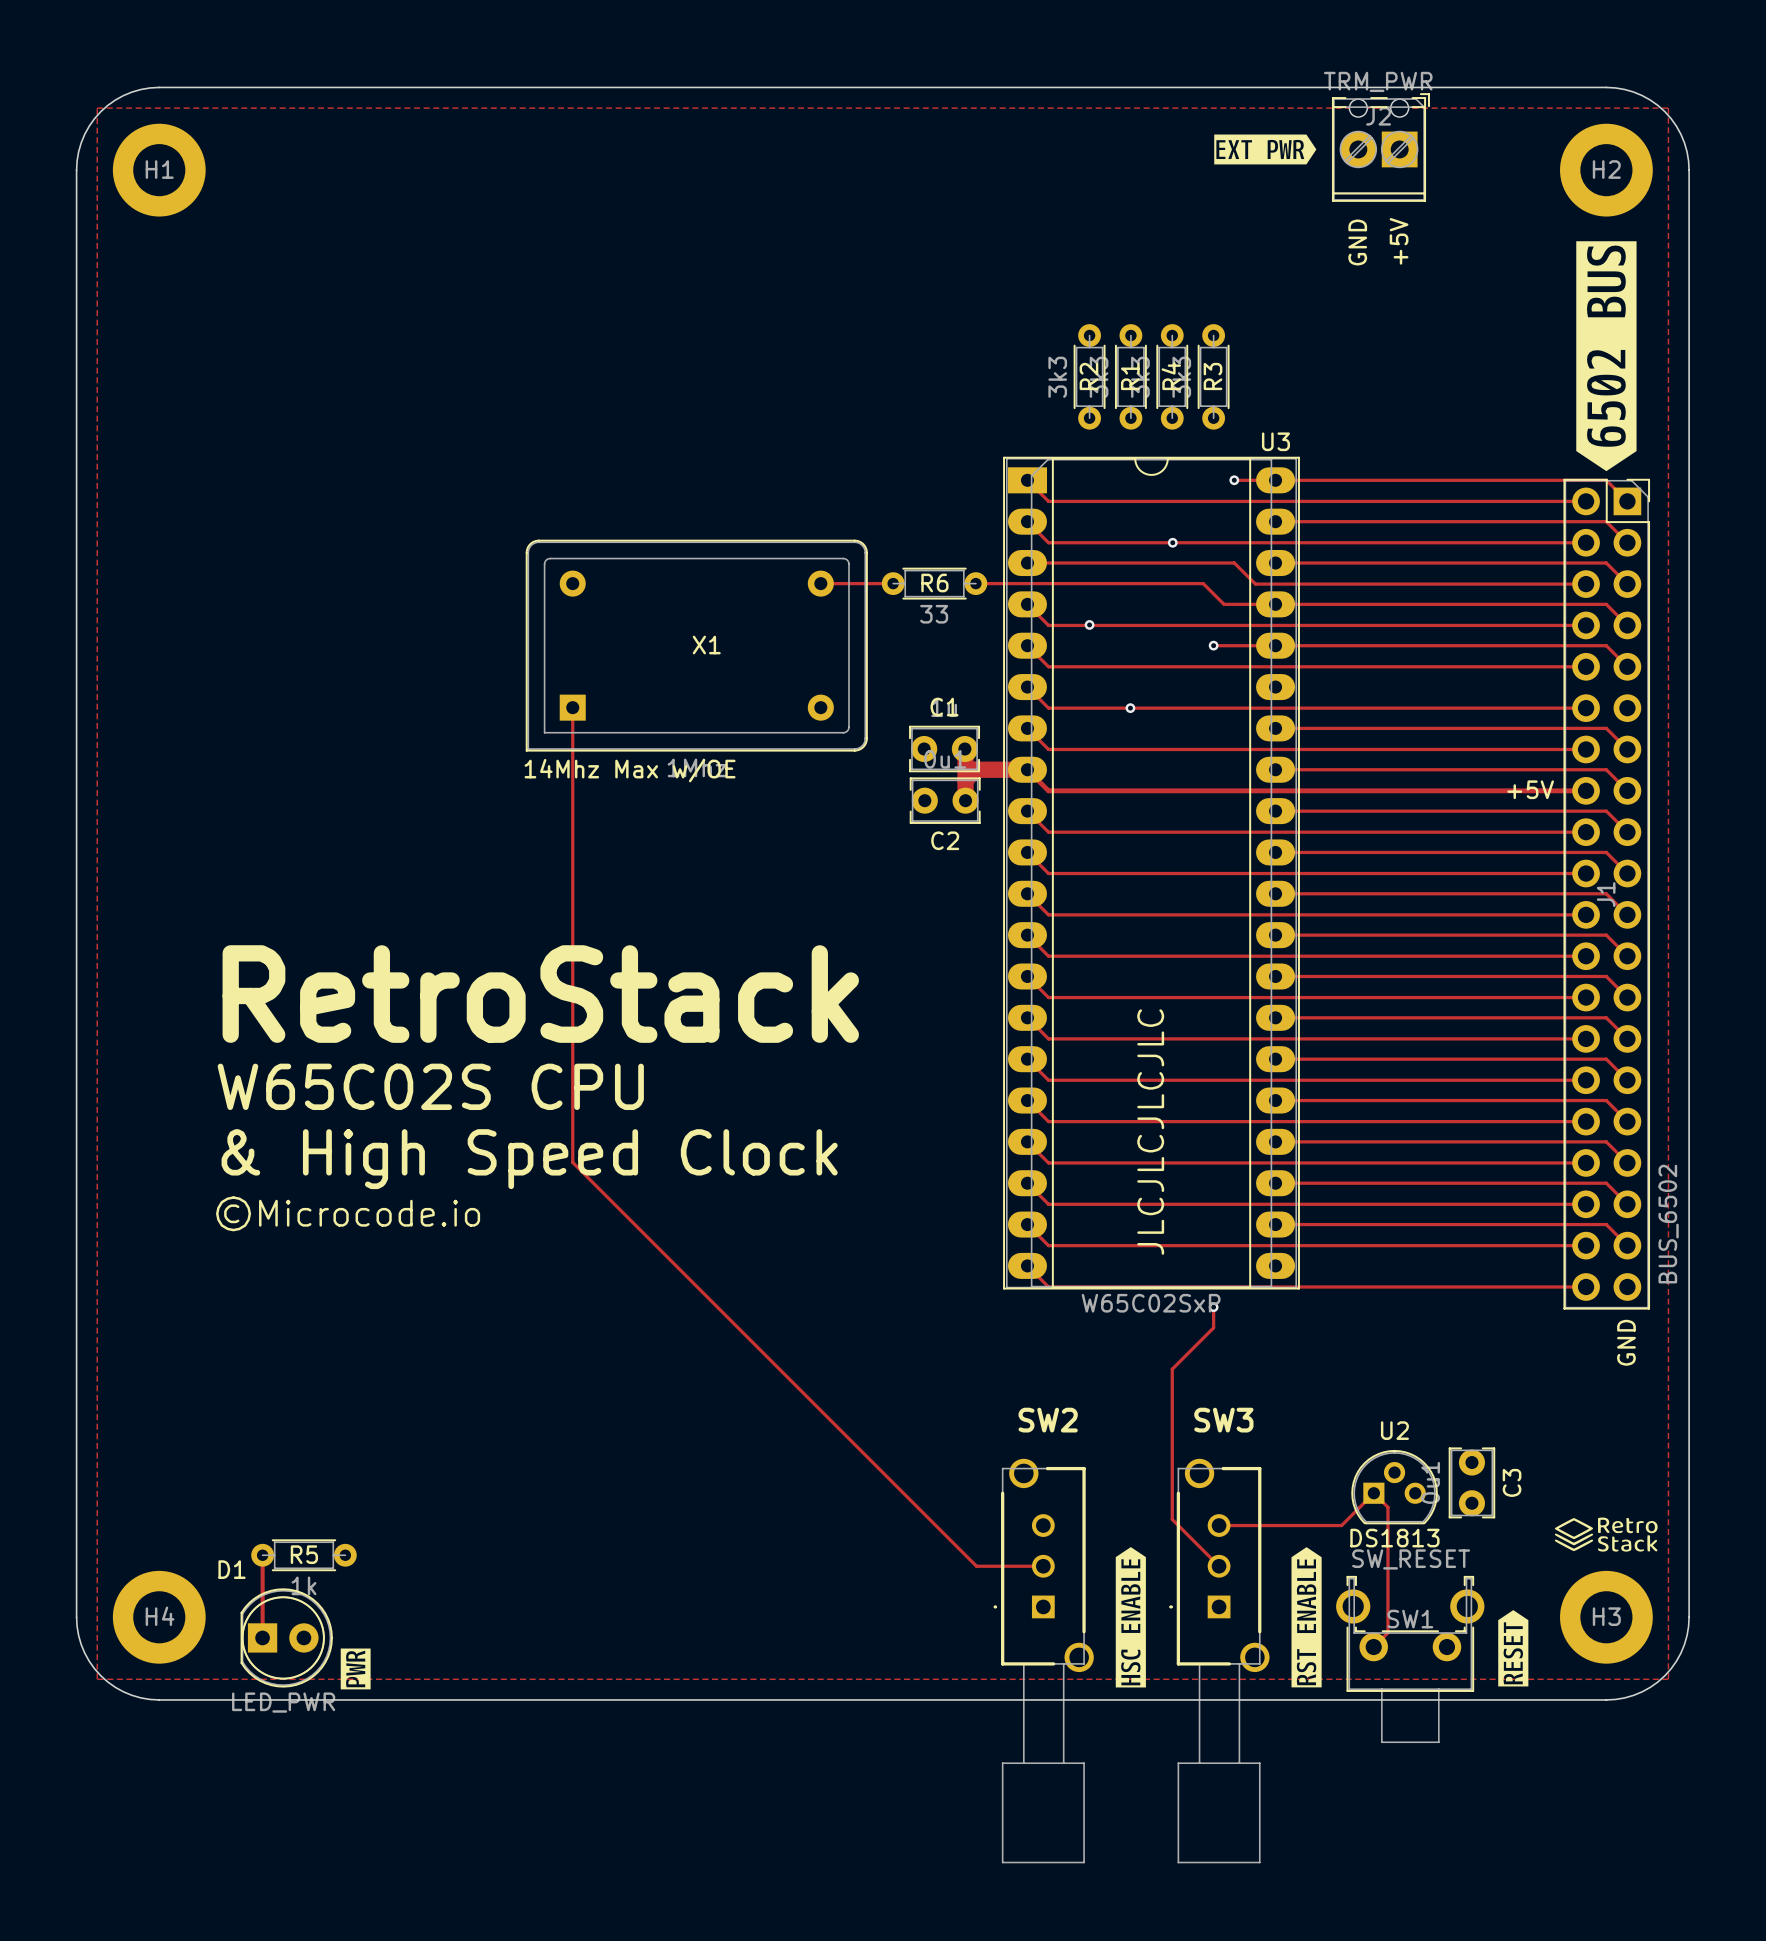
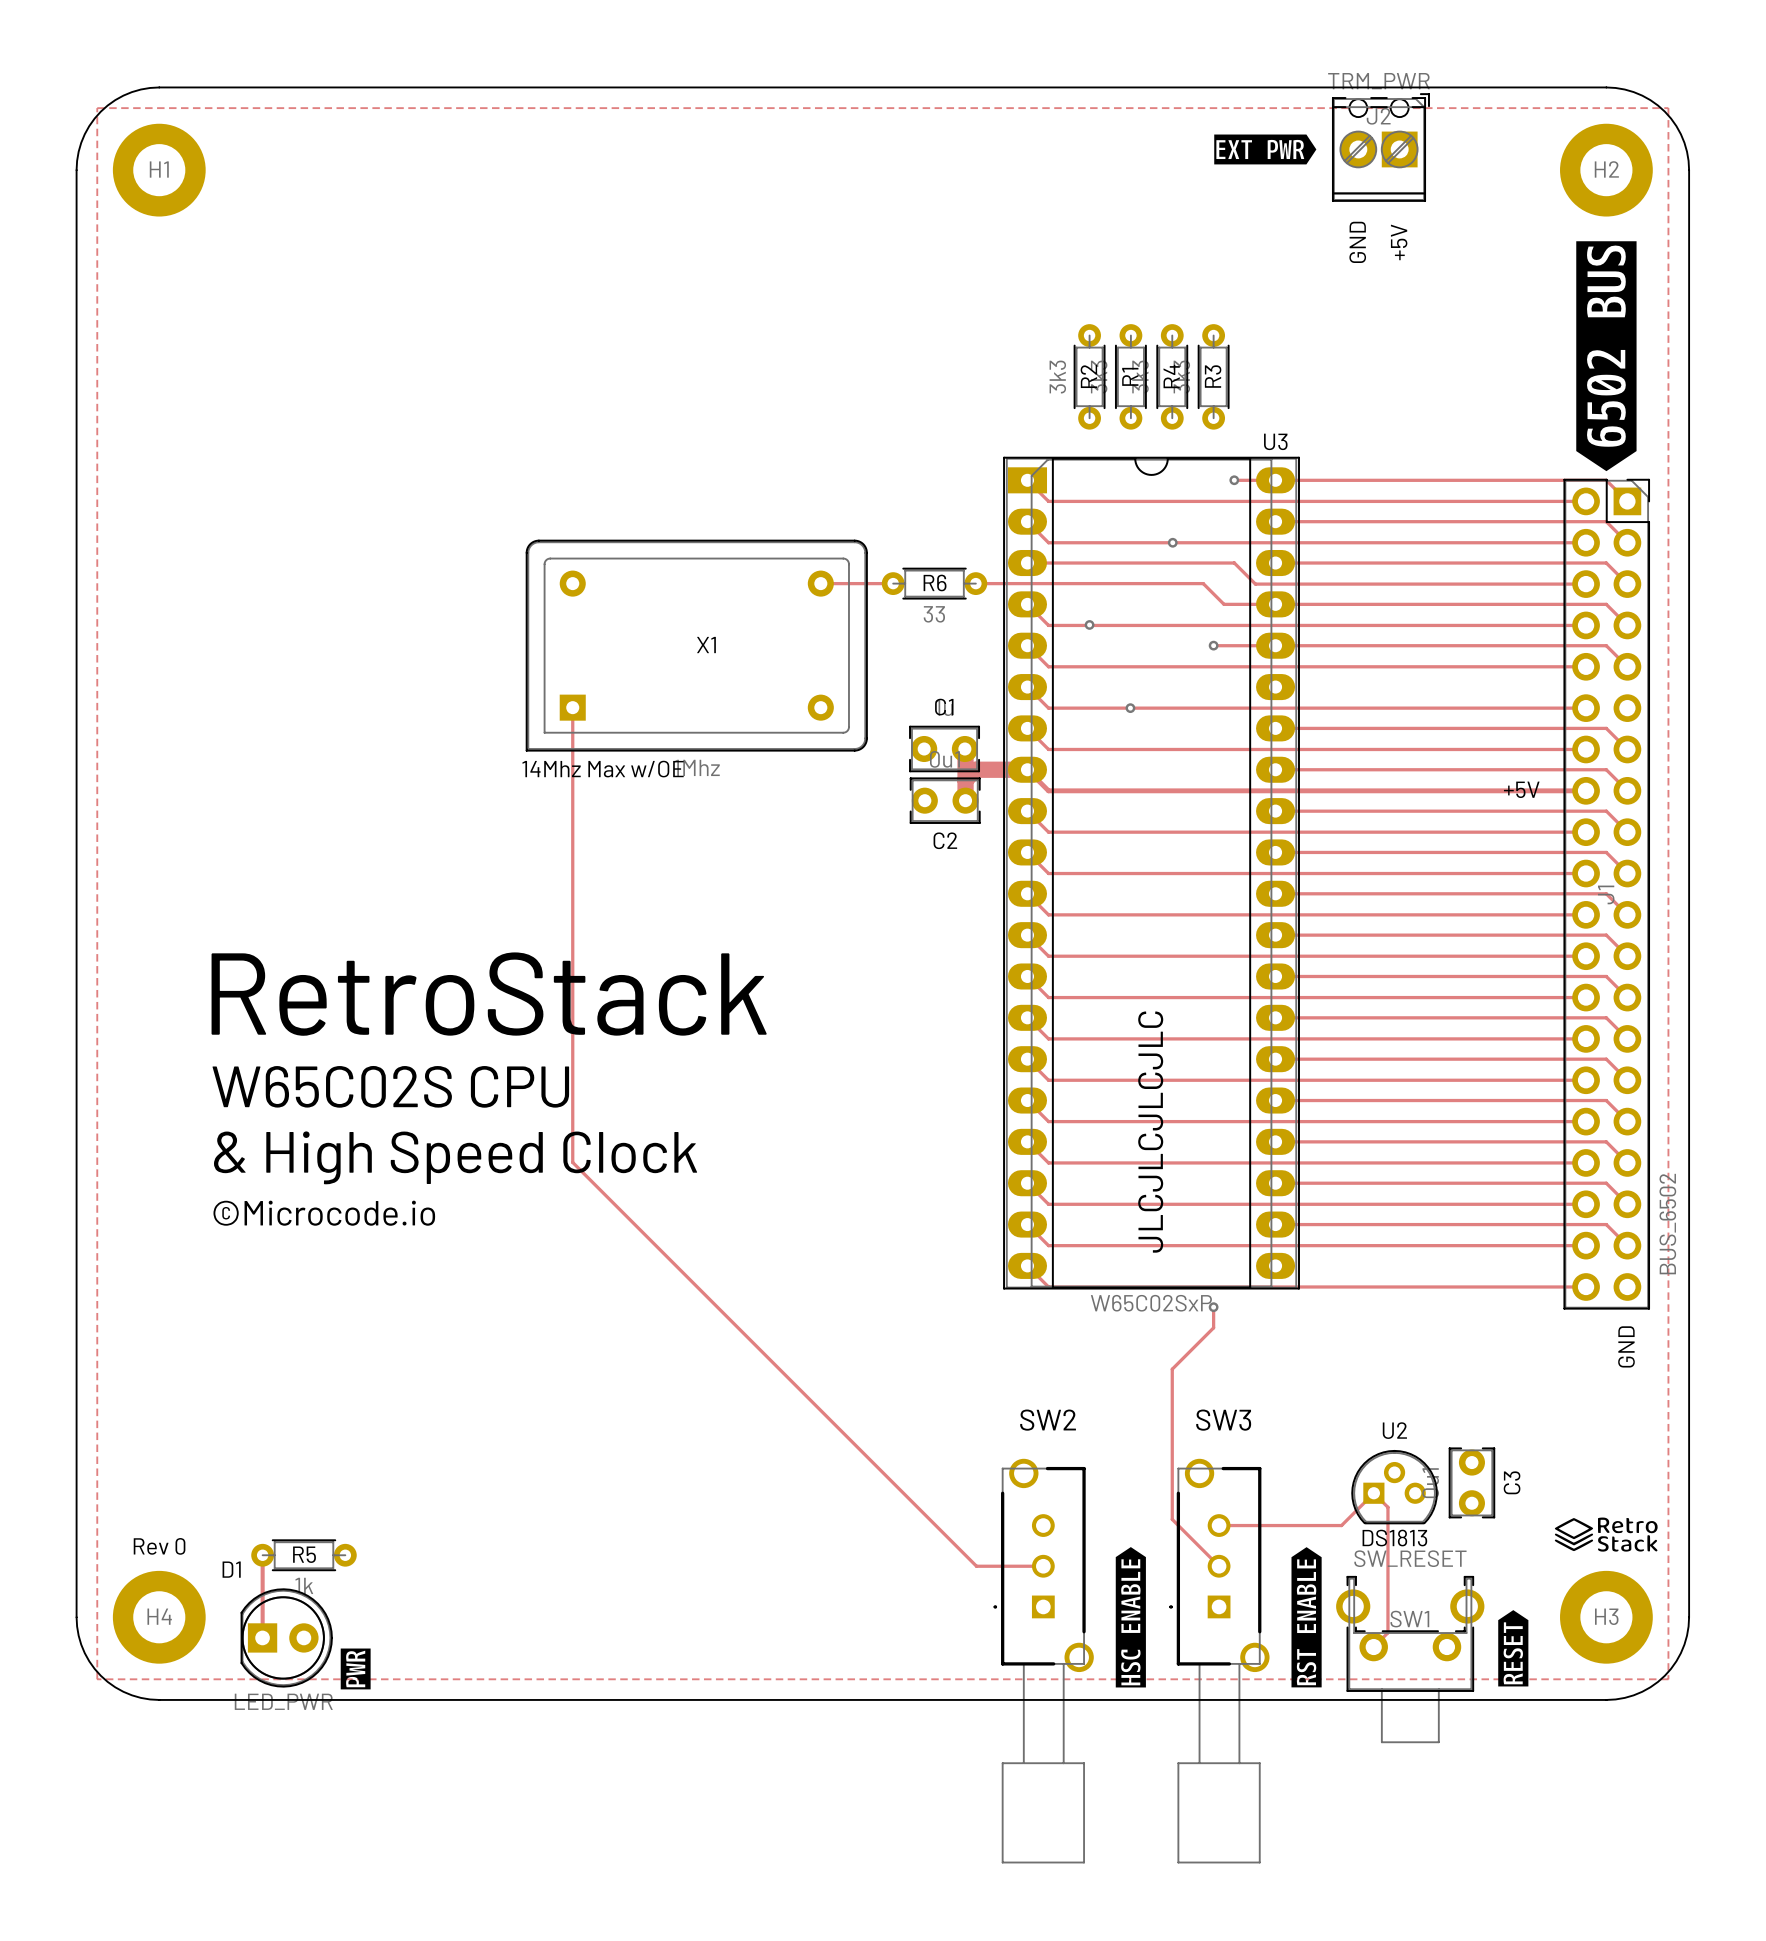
text: none -> Rev 0 (159, 1546)

